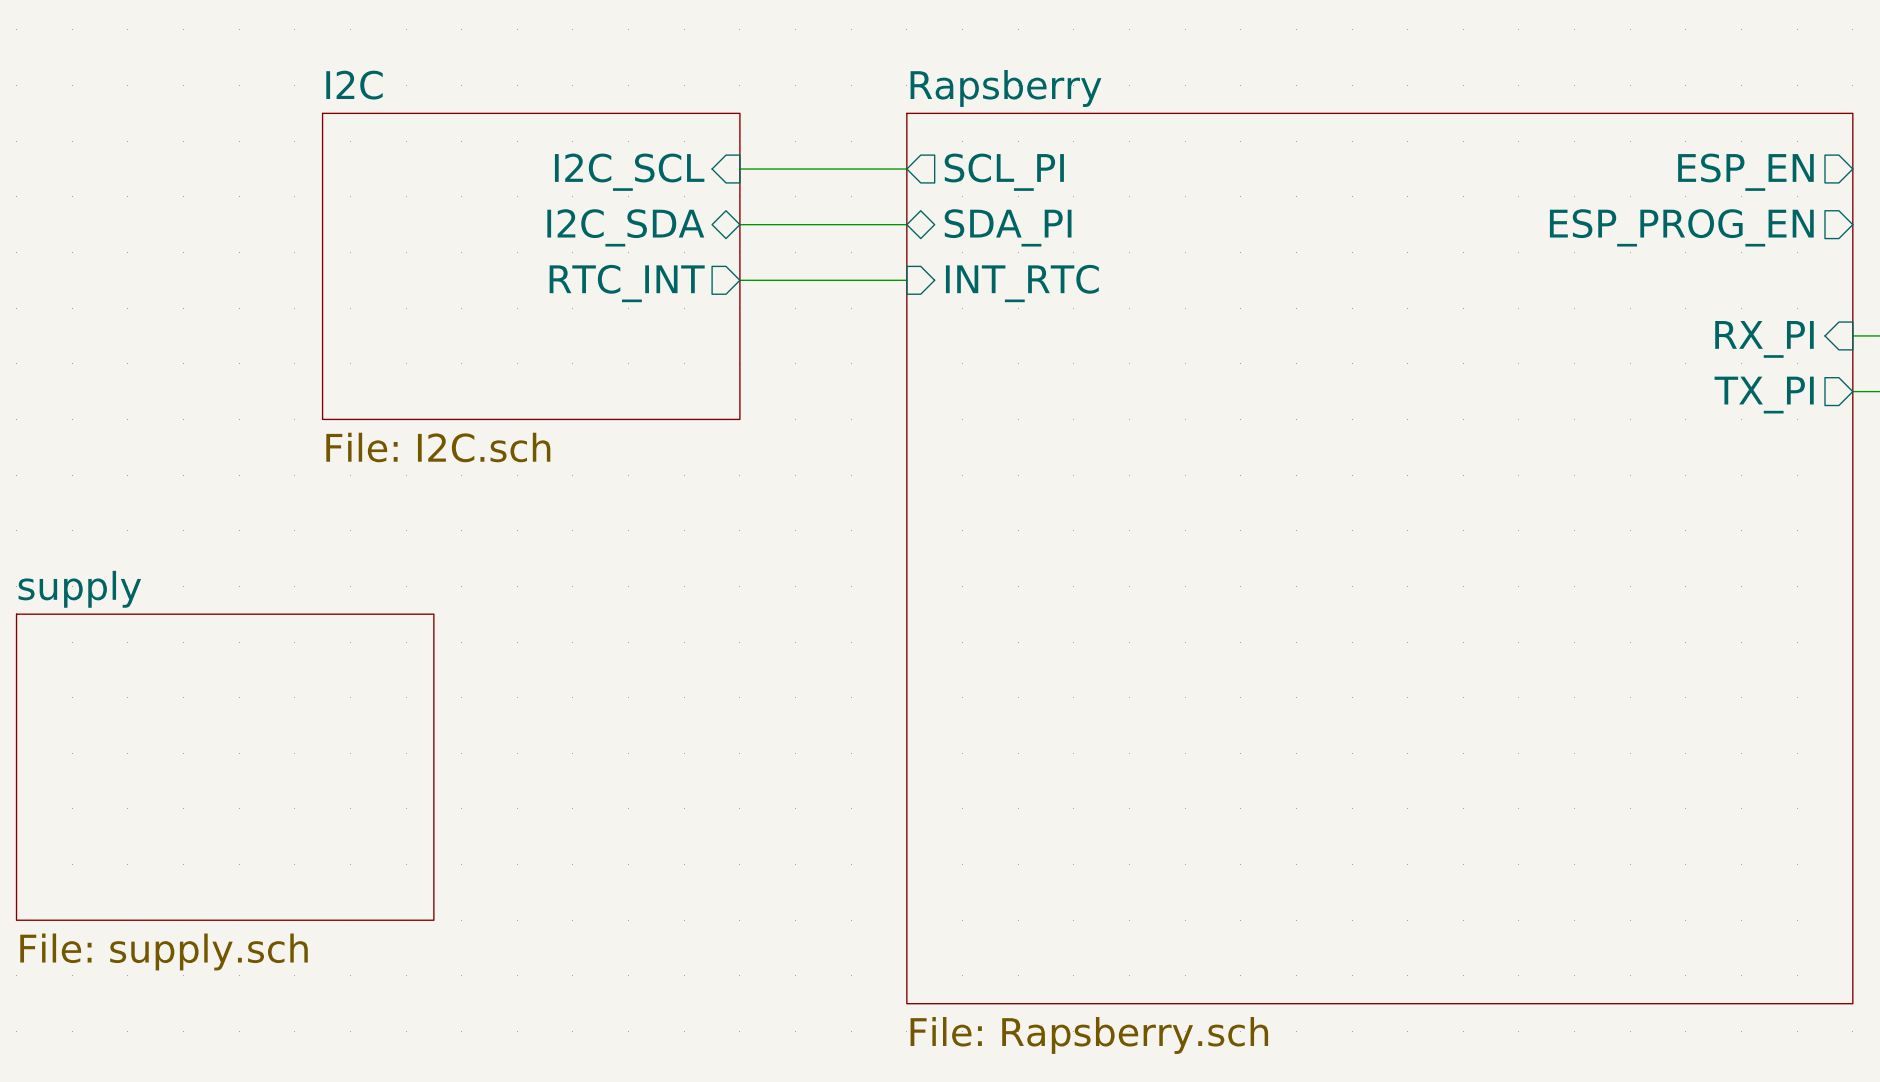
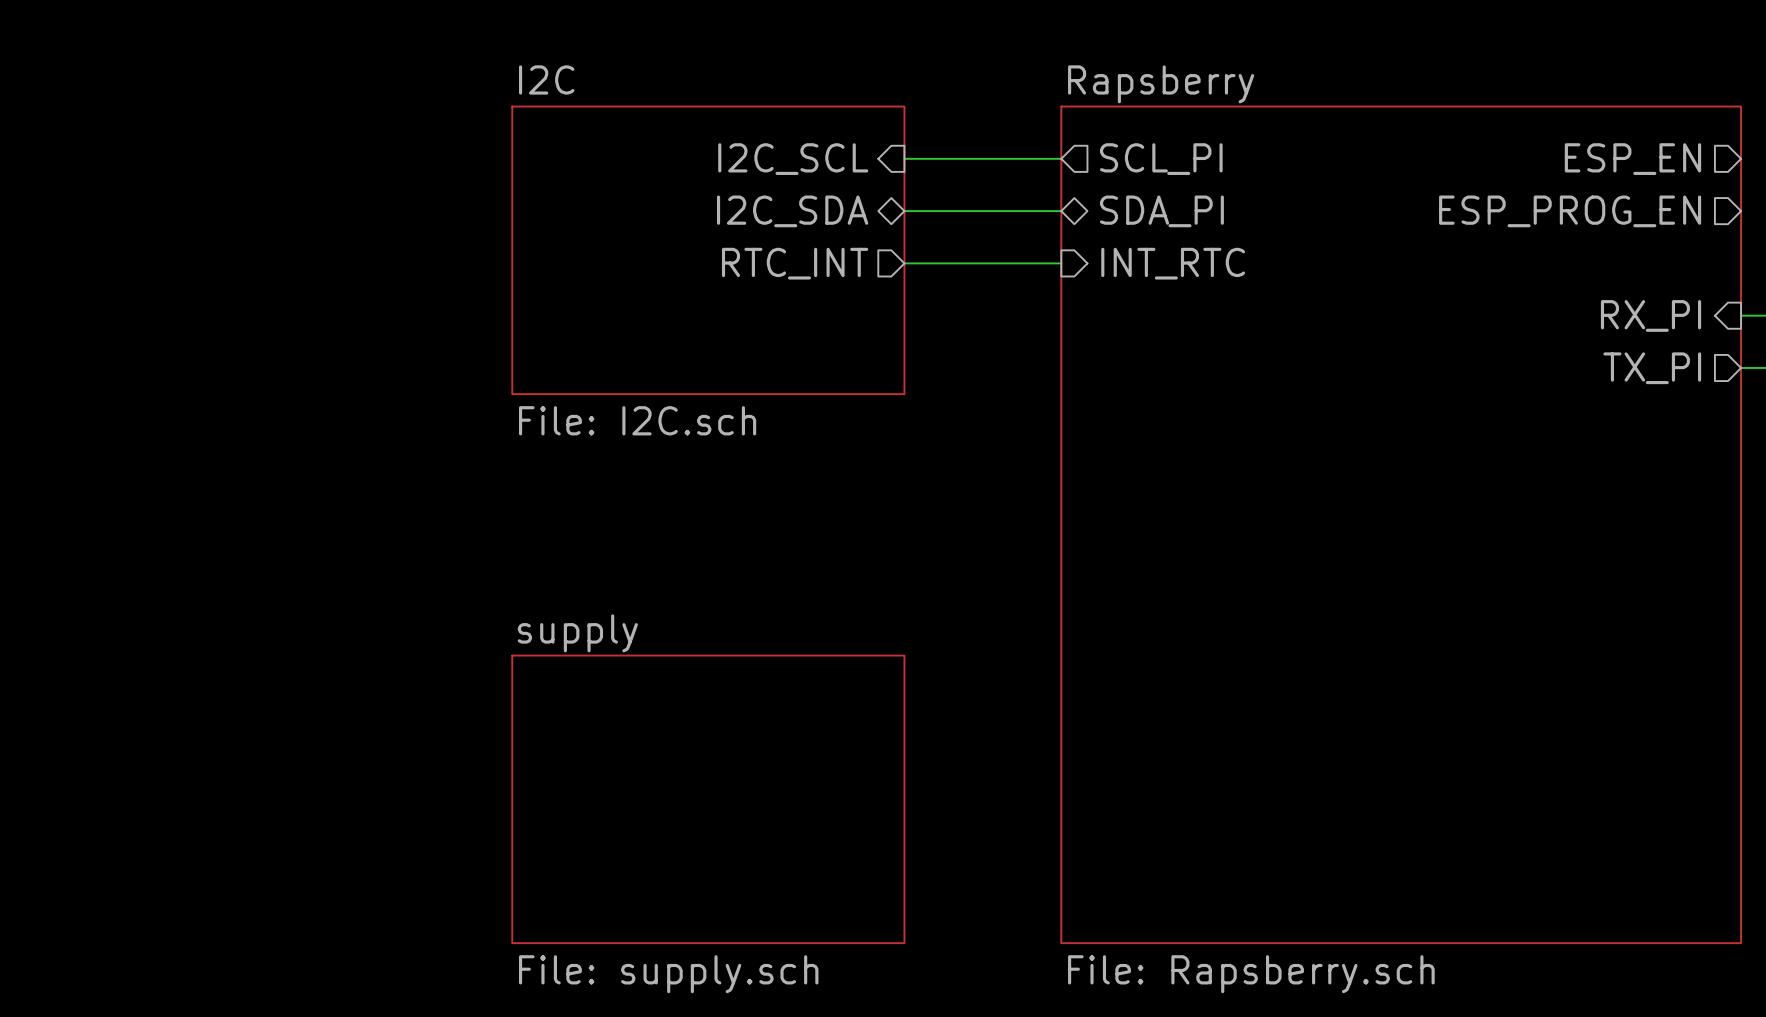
wire: (739, 169) (906, 169) -> (904, 158) (1061, 158)
sheet pin position: I2C_SCL (629, 172) -> I2C_SCL (793, 159)
sheet pin position: SCL_PI (1004, 172) -> SCL_PI (1161, 159)
wire: (739, 224) (906, 224) -> (904, 211) (1061, 211)
sheet pin position: I2C_SDA (625, 227) -> I2C_SDA (792, 211)
sheet pin position: SDA_PI (1008, 227) -> SDA_PI (1161, 211)
sheet I2C position: (531, 266) -> (708, 250)
wire: (739, 280) (906, 280) -> (904, 263) (1061, 263)
sheet pin position: RTC_INT (627, 283) -> RTC_INT (795, 263)
sheet pin position: INT_RTC (1022, 283) -> INT_RTC (1173, 263)
sheet Rapsberry: File: Rapsberry.sch (1379, 558) -> none
sheet Rapsberry: none -> File: Rapsberry.sch (1401, 524)
sheet supply position: (225, 767) -> (708, 799)

